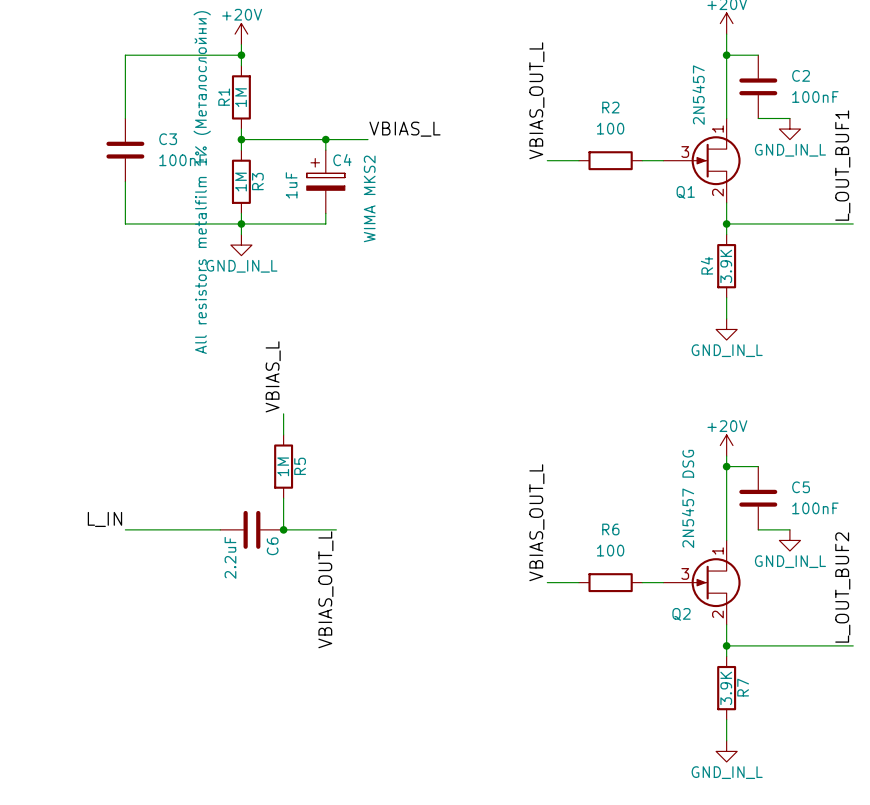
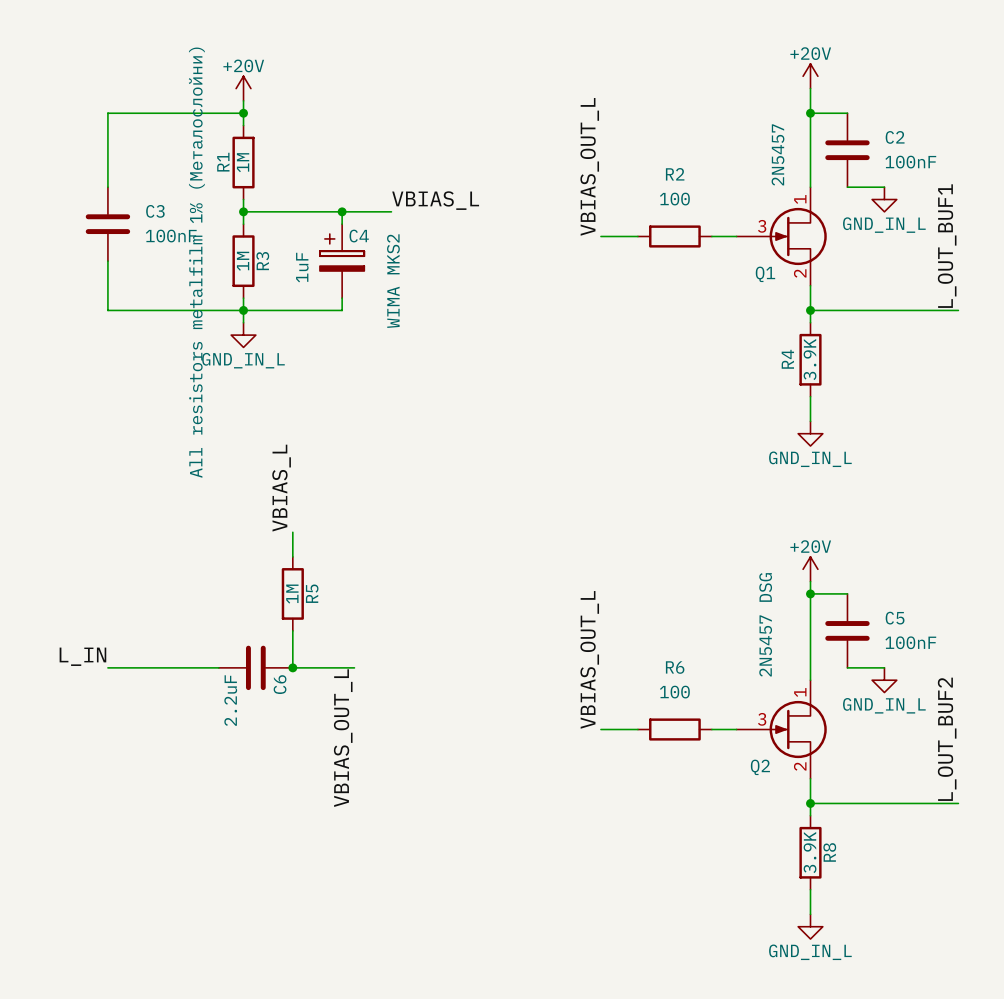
R7 name: R7 (743, 687) -> R8 (829, 852)

